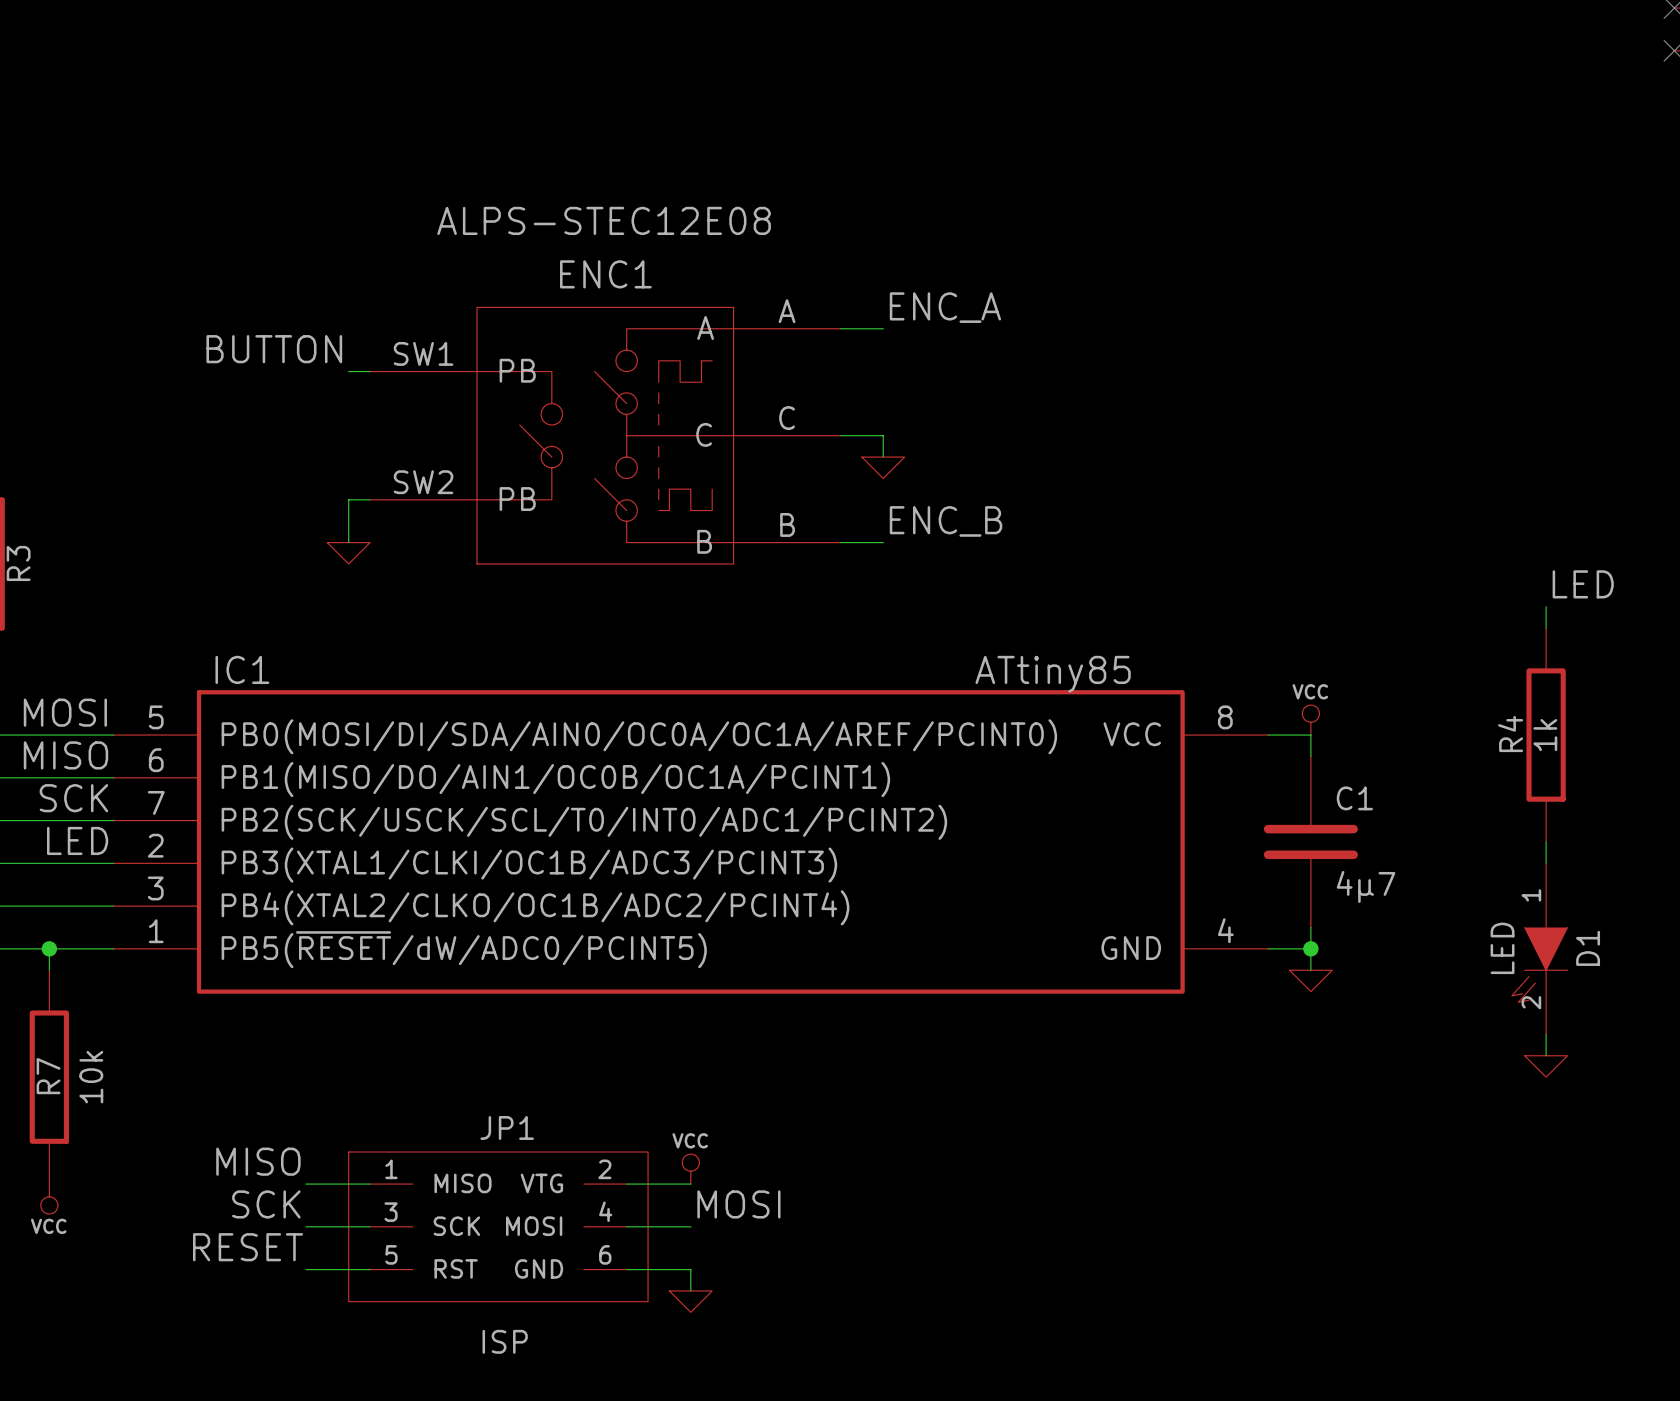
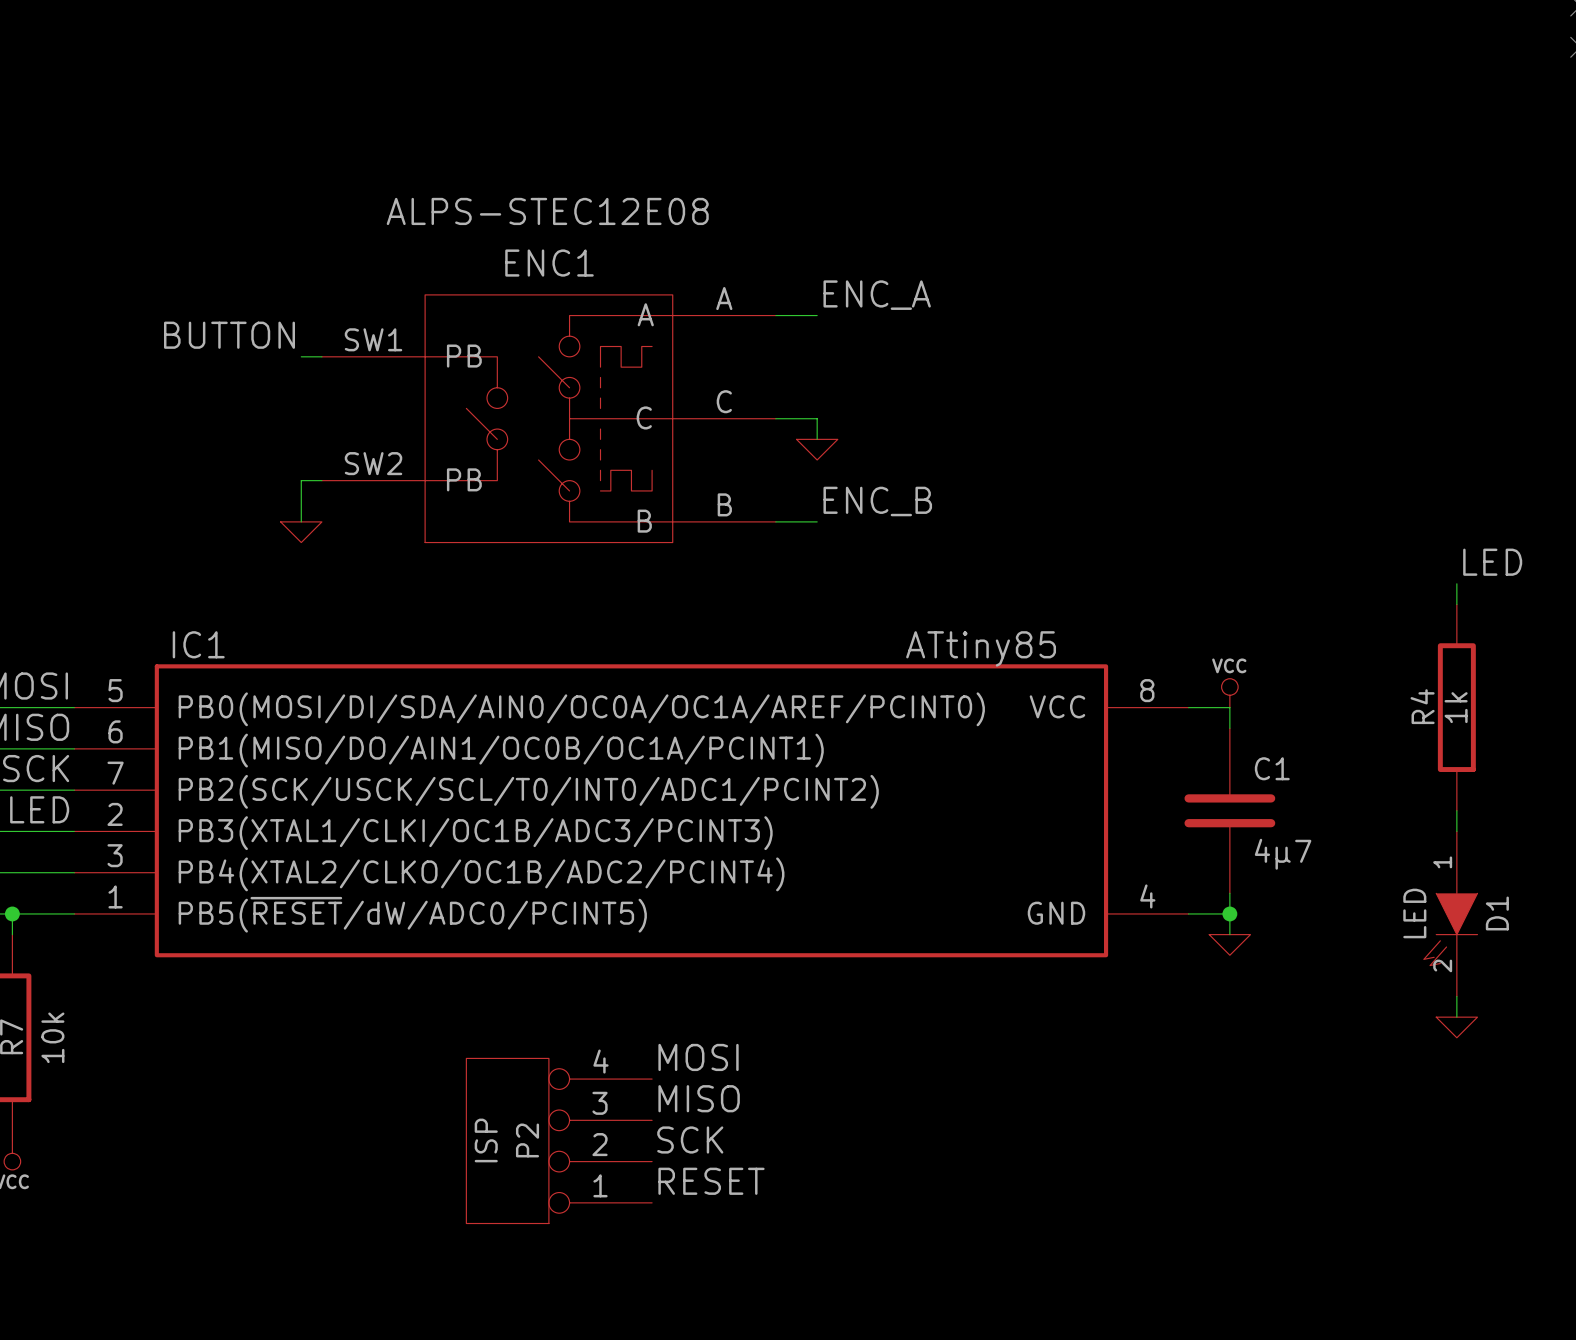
label position: MISO (258, 1161) -> MISO (699, 1098)
power symbol: VCC (690, 1169) -> none
wire: (305, 1184) (370, 1184) -> none
P2: none -> ISP (559, 1140)
wire: (626, 1184) (690, 1184) -> none
label position: SCK (266, 1204) -> SCK (690, 1140)
label position: MOSI (738, 1204) -> MOSI (698, 1057)
wire: (305, 1226) (370, 1226) -> none
JP1: ISP (498, 1226) -> none
wire: (626, 1226) (690, 1226) -> none
label position: RESET (248, 1247) -> RESET (711, 1181)
wire: (305, 1269) (370, 1269) -> none
wire: (626, 1269) (690, 1269) (690, 1290) -> none
power symbol: (690, 1301) -> none

